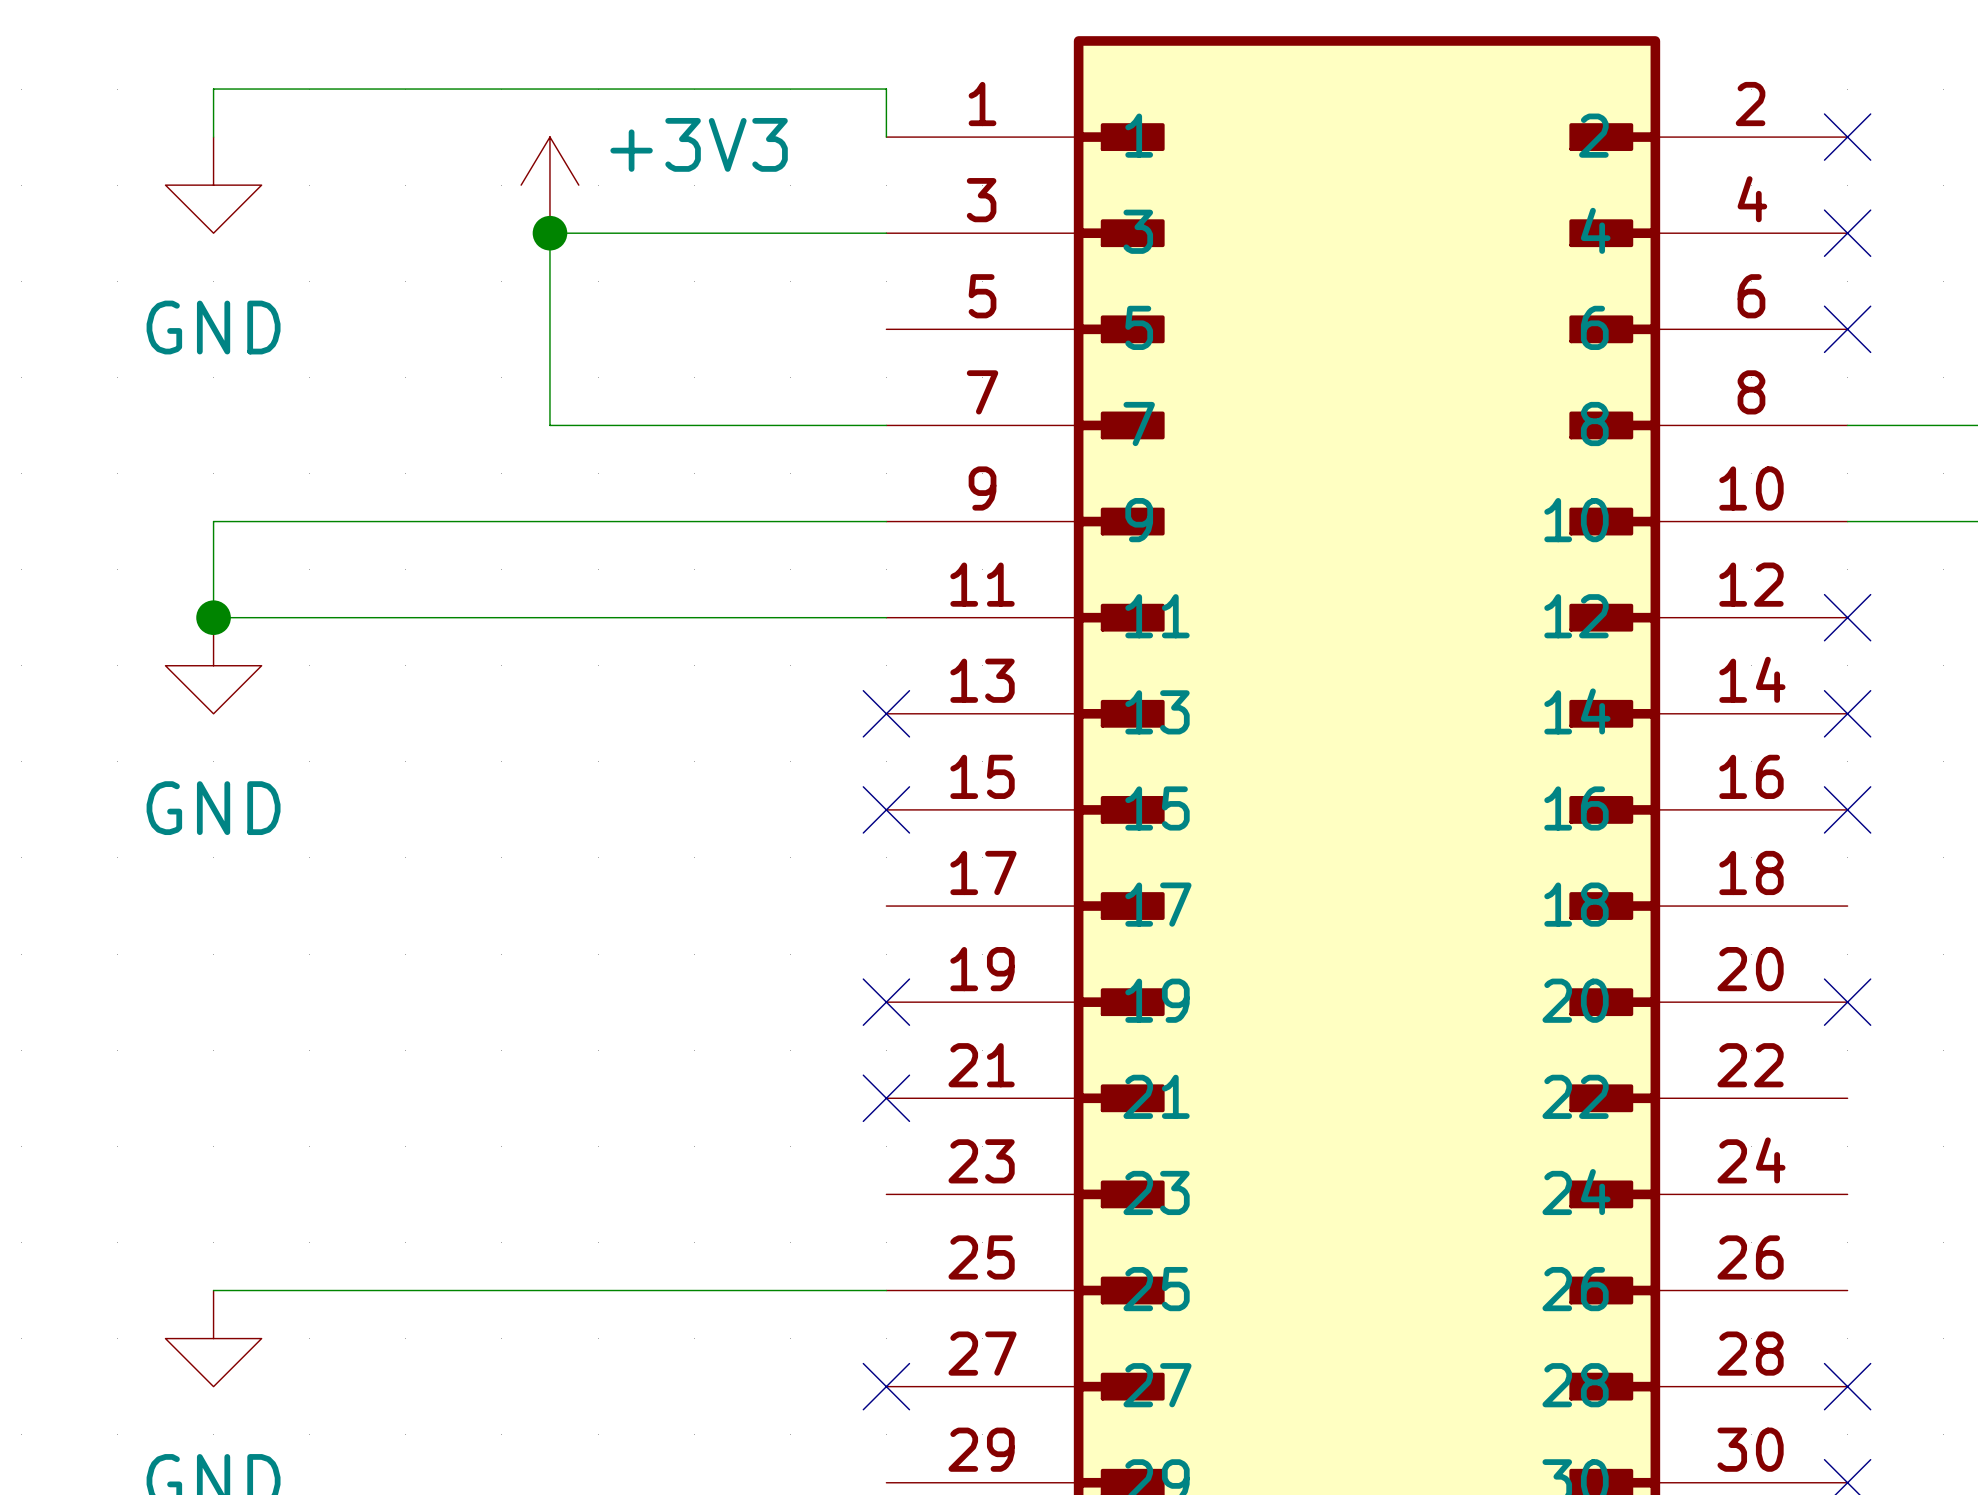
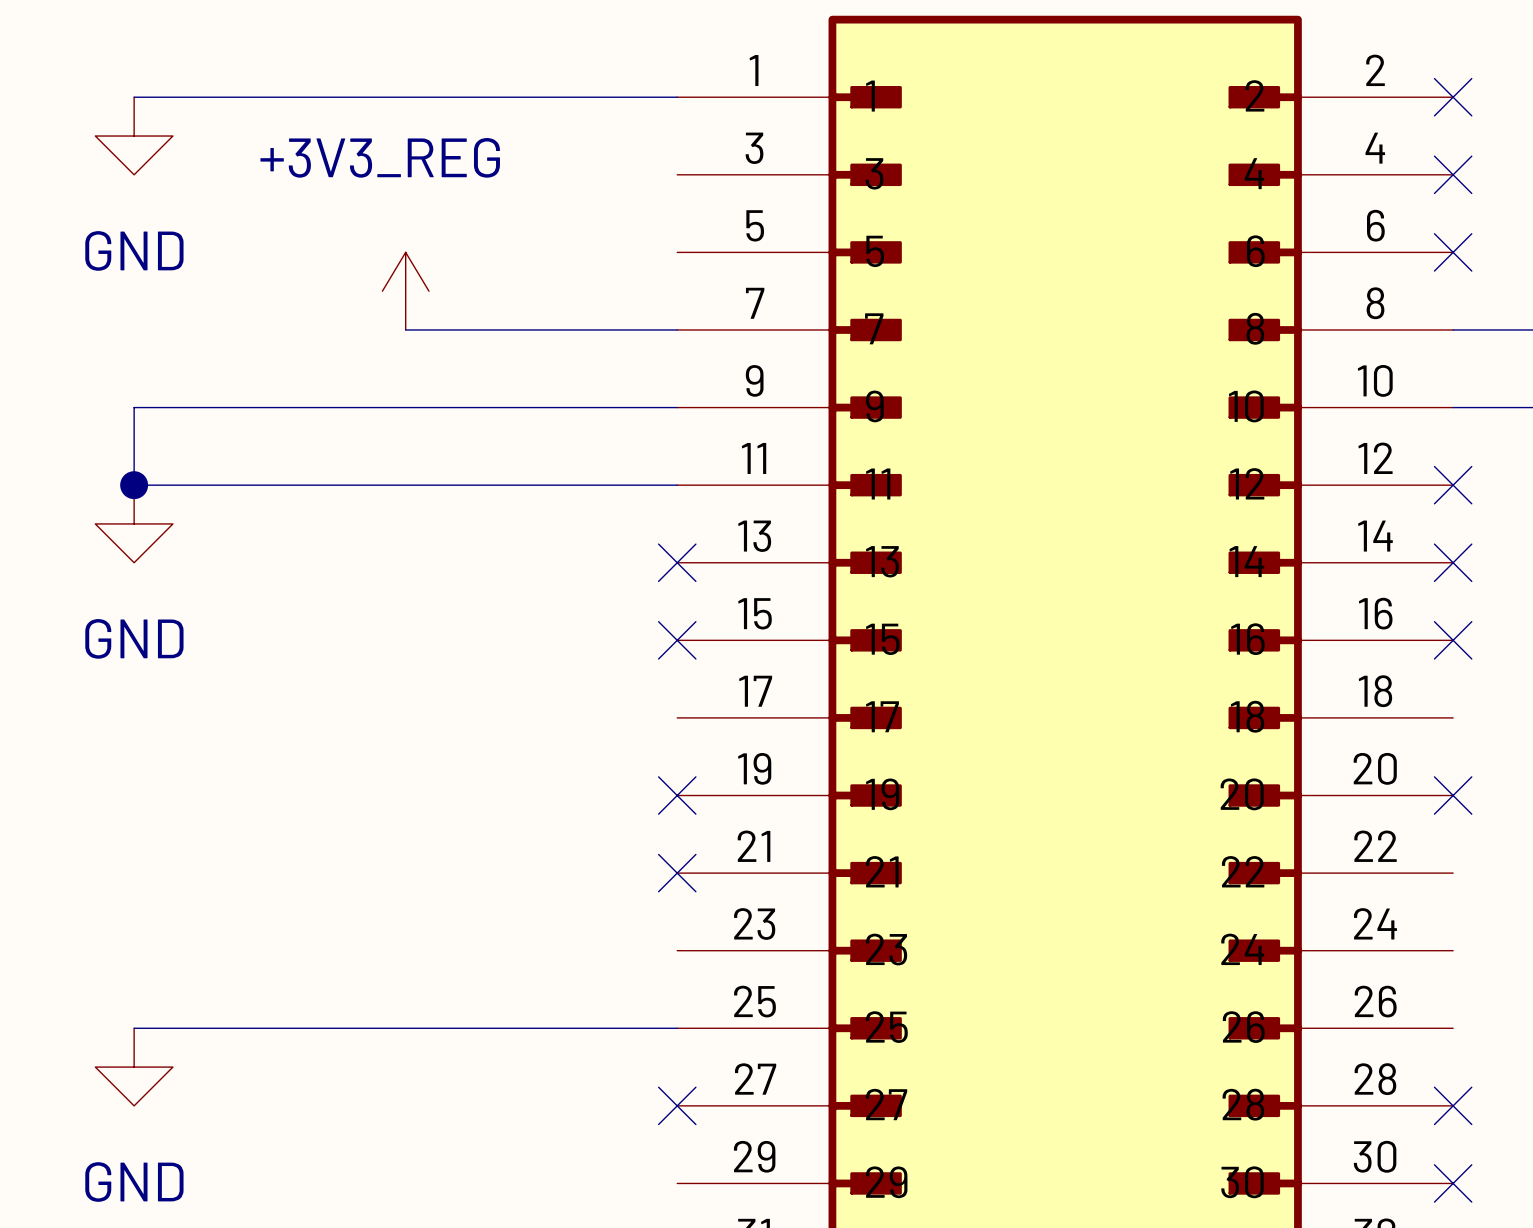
wire: (213, 137) (213, 89) (886, 89) (886, 137) -> (134, 97) (677, 97)
power symbol: +3V3 (549, 185) -> none
junction: (549, 233) -> none
wire: (886, 233) (549, 233) (549, 425) -> none
power symbol: none -> +3V3_REG (405, 291)

